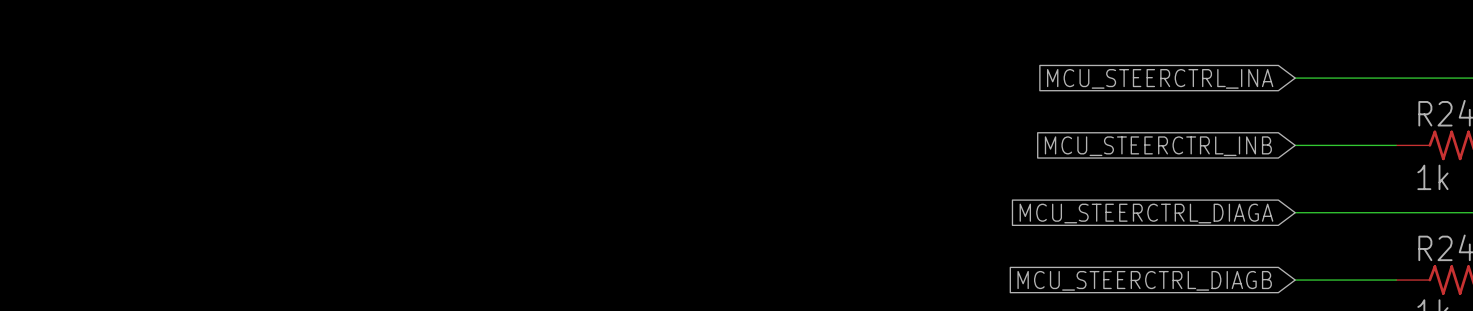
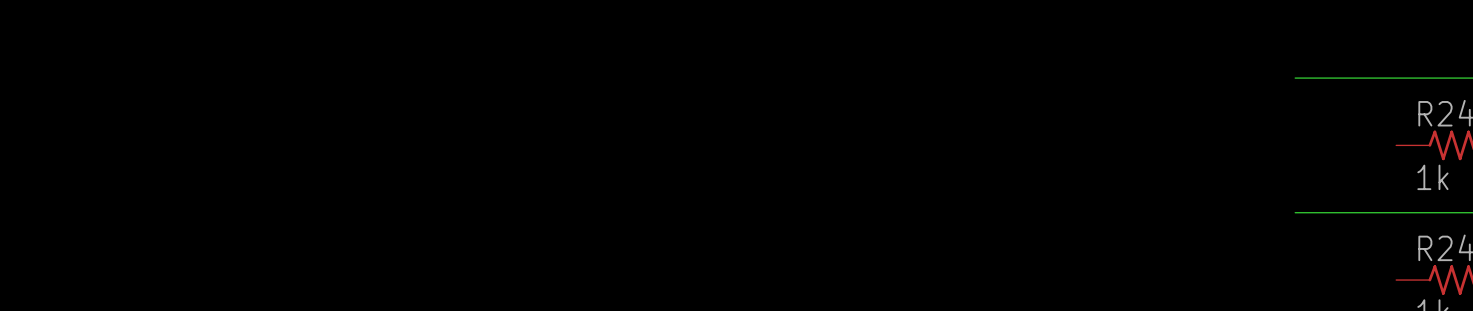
global label: MCU_STEERCTRL_INA (1160, 78) -> none
wire: (1295, 145) (1396, 145) -> none
global label: MCU_STEERCTRL_INB (1158, 146) -> none
global label: MCU_STEERCTRL_DIAGA (1146, 213) -> none
global label: MCU_STEERCTRL_DIAGB (1144, 280) -> none
wire: (1295, 280) (1396, 280) -> none

